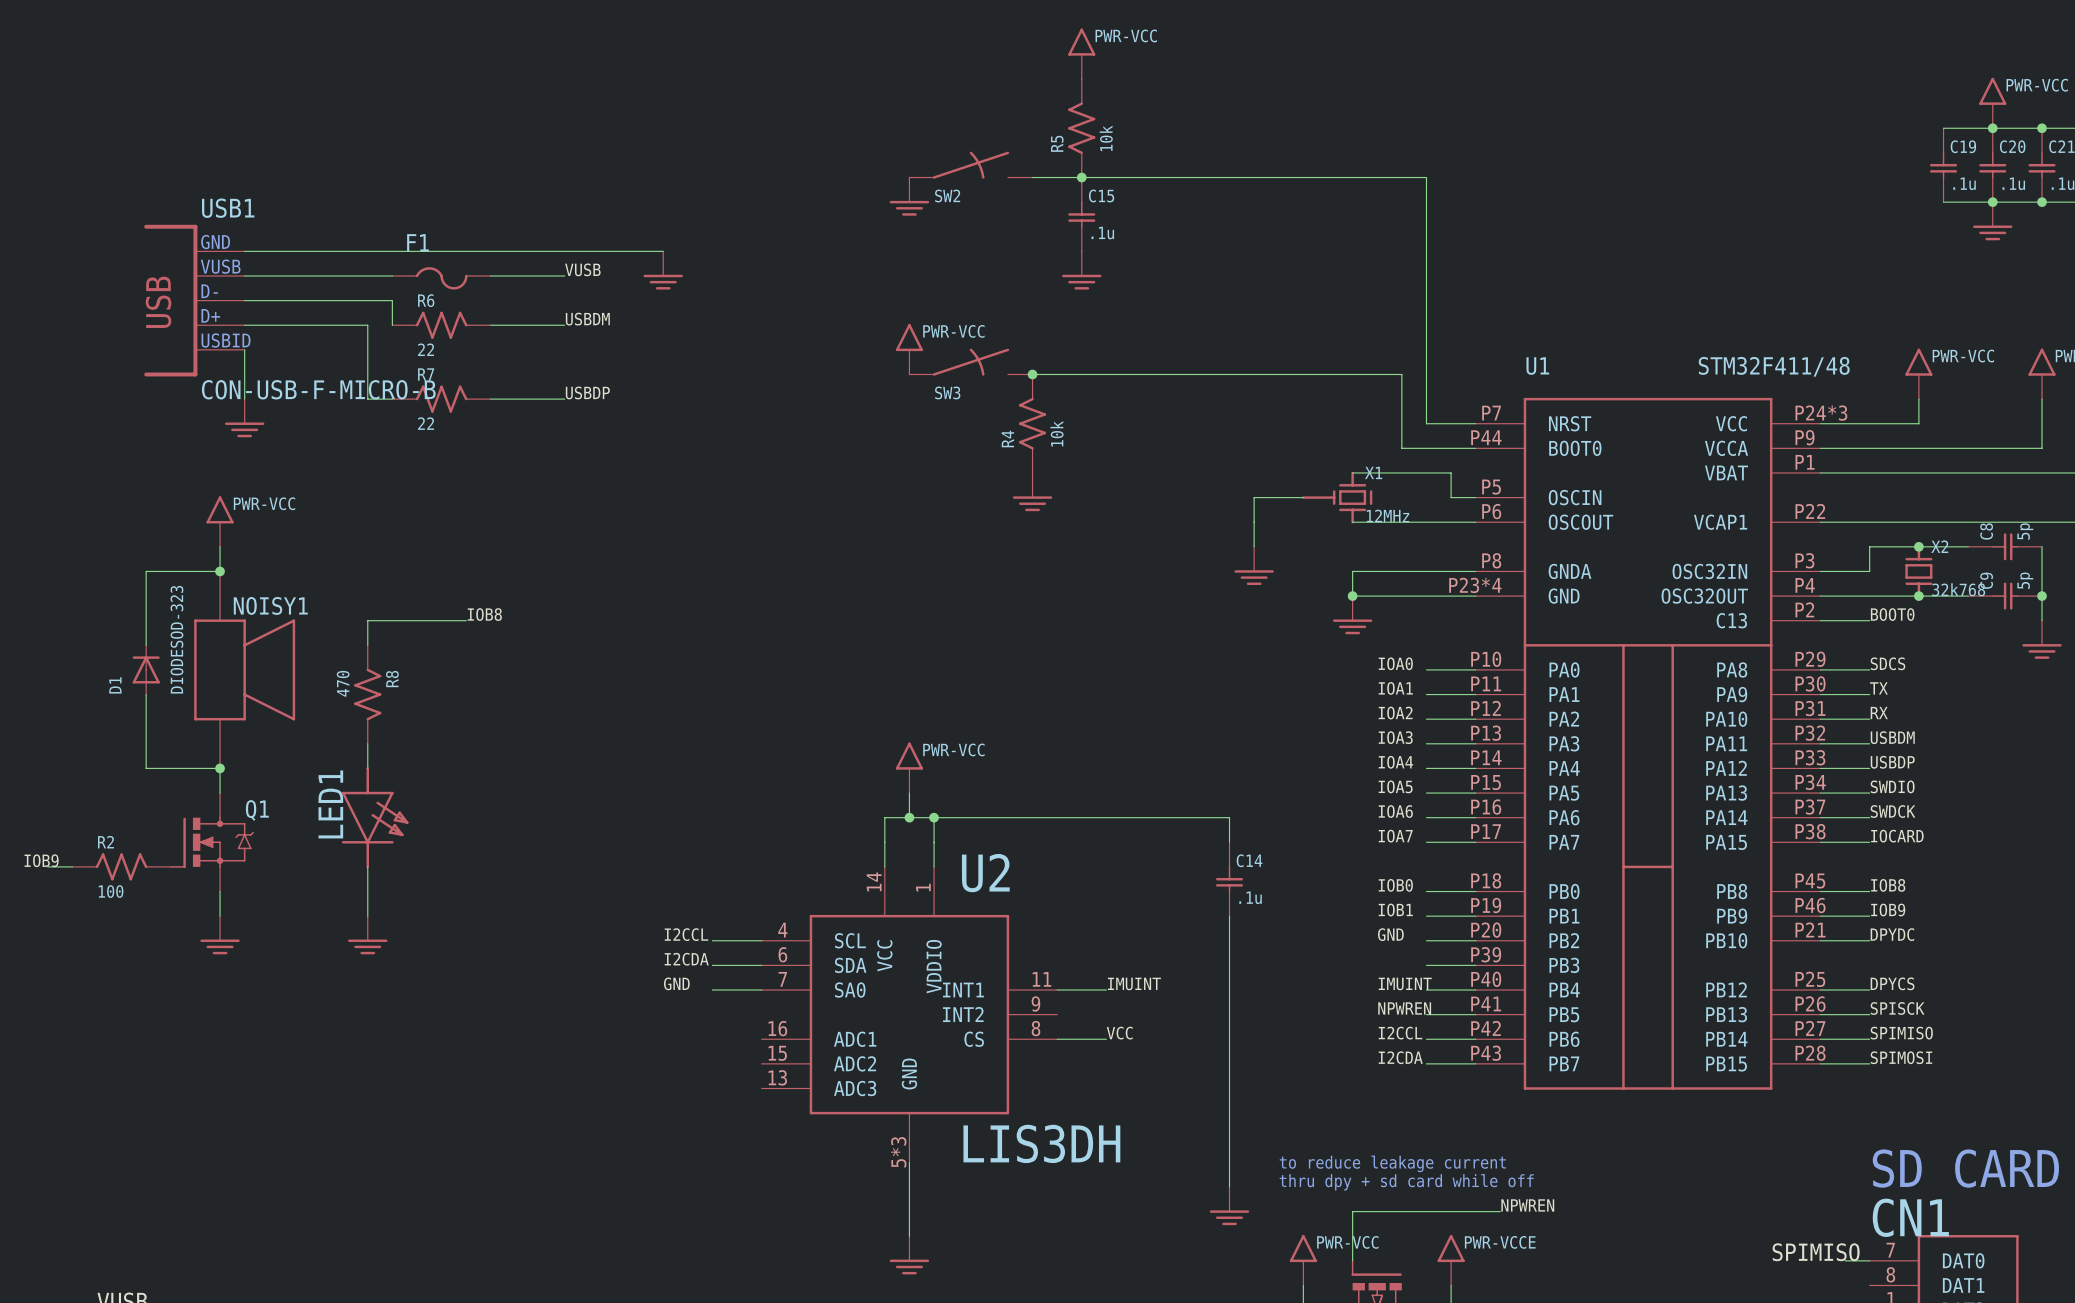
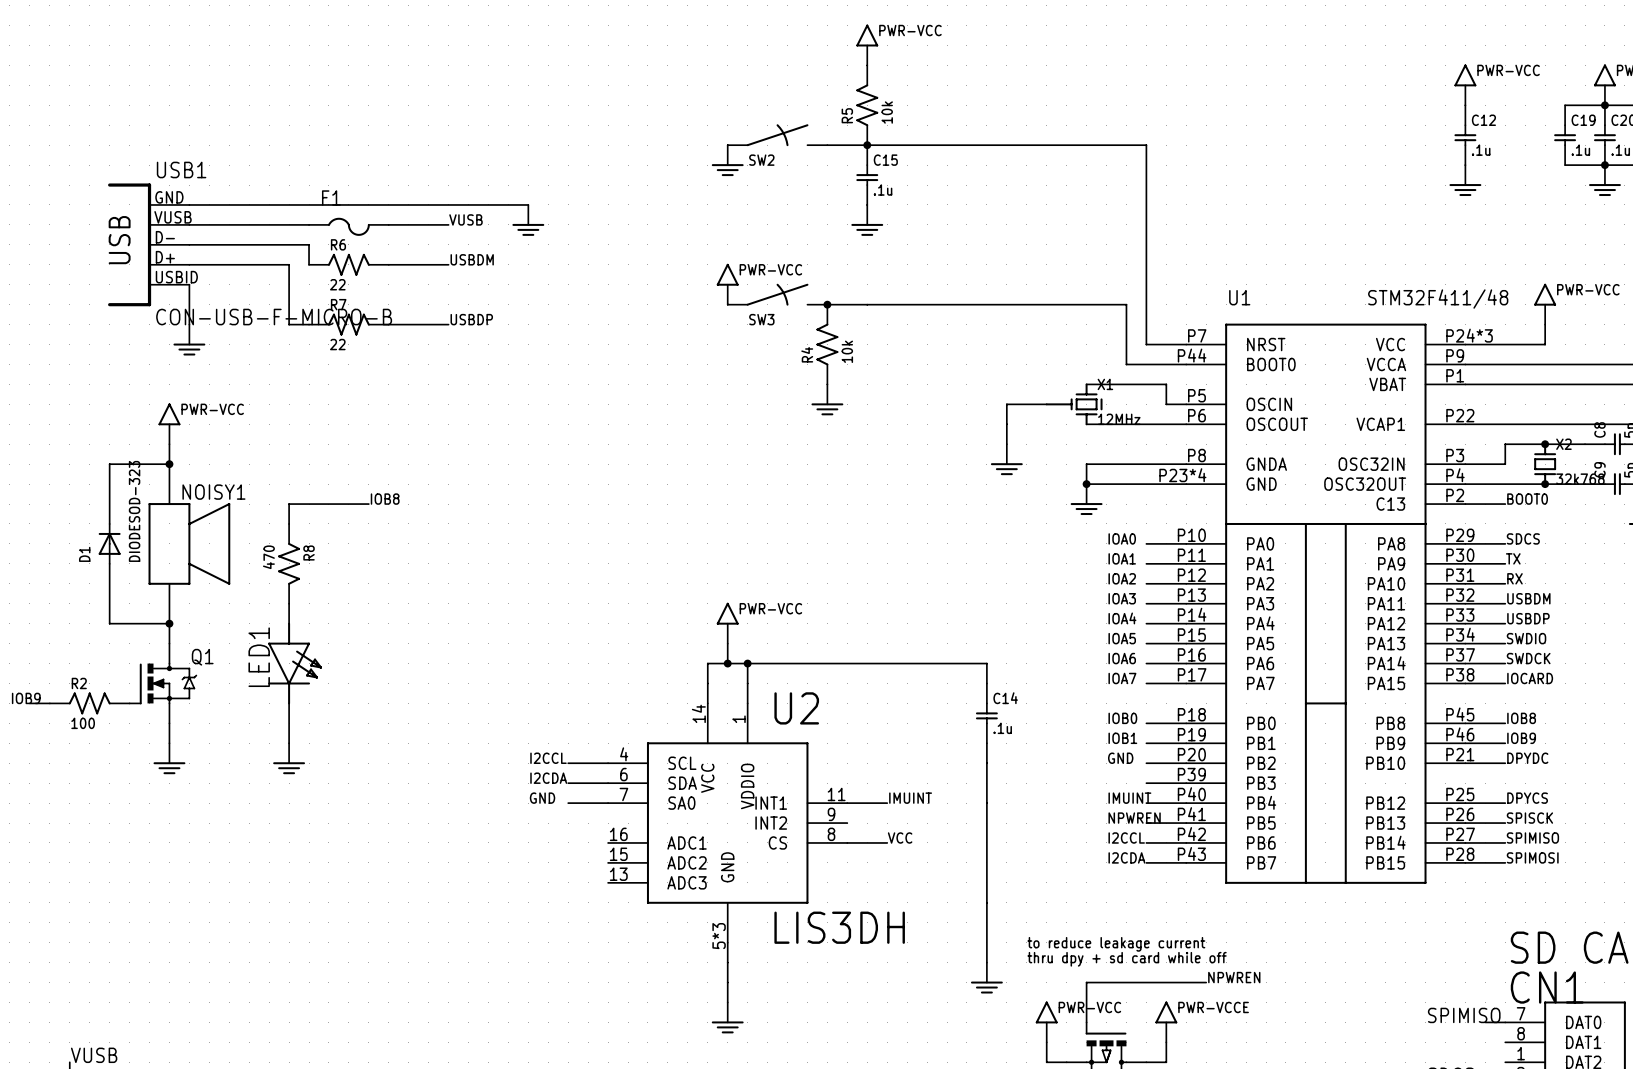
power symbol: none -> PWR-VCC (1465, 84)
C12: none -> .1u (1465, 135)
power symbol: none -> (1465, 180)

